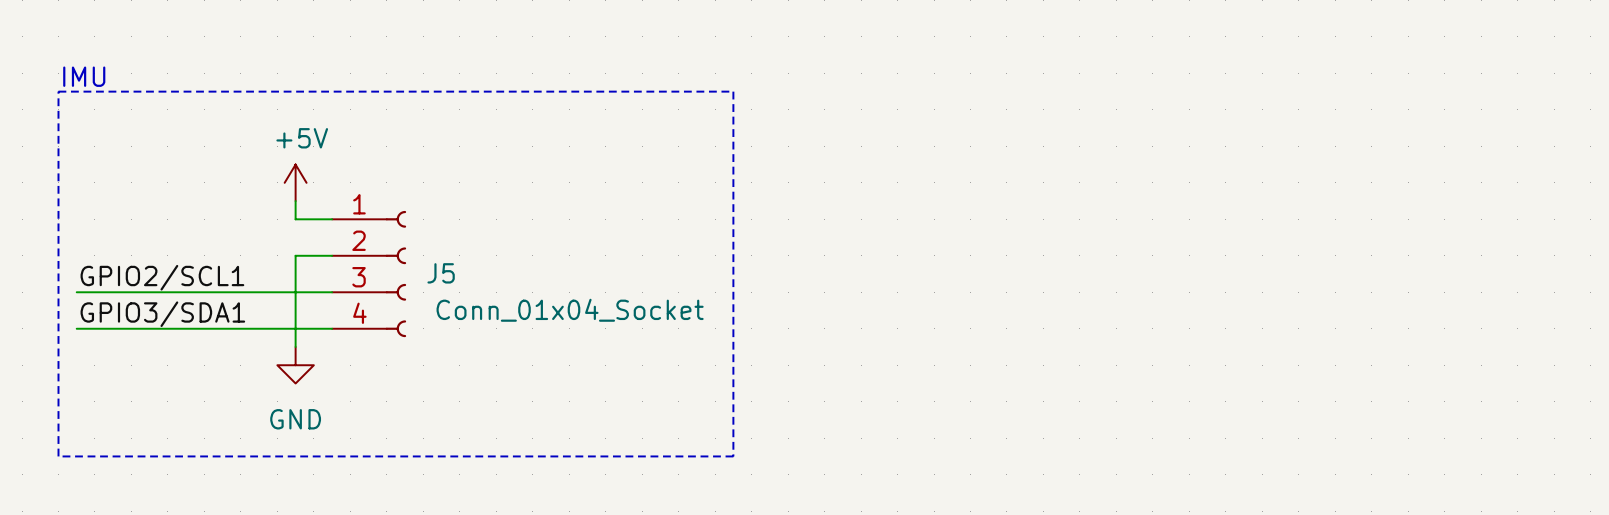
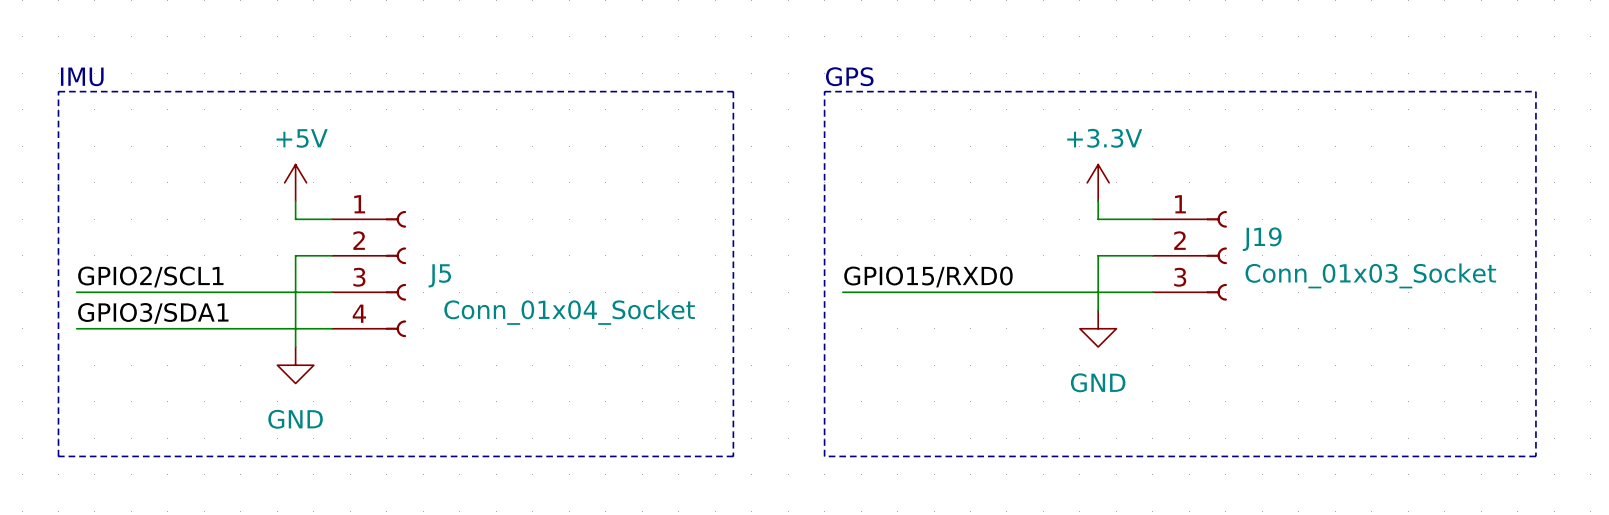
text: none -> GPS (849, 76)
line: none -> (824, 91) (1535, 91) (1535, 456) (824, 456) (824, 91)
power symbol: none -> +3.3V (1098, 182)
wire: none -> (1098, 201) (1098, 219) (1152, 219)
wire: none -> (1152, 255) (1098, 255) (1098, 310)
J19: none -> Conn_01x03_Socket (1189, 255)
label: none -> GPIO15/RXD0 (928, 276)
wire: none -> (842, 292) (1152, 292)
power symbol: none -> GND (1098, 328)

